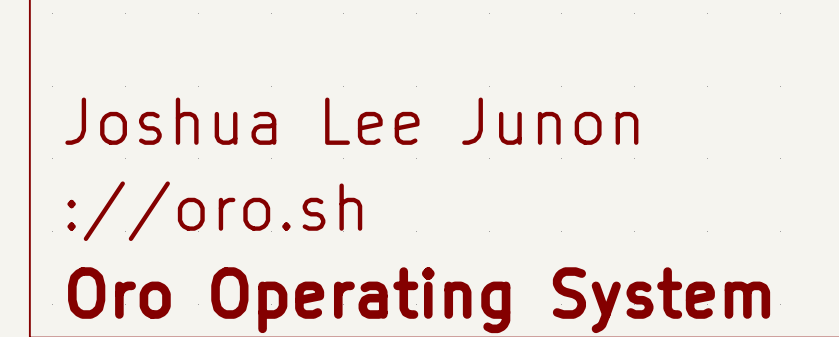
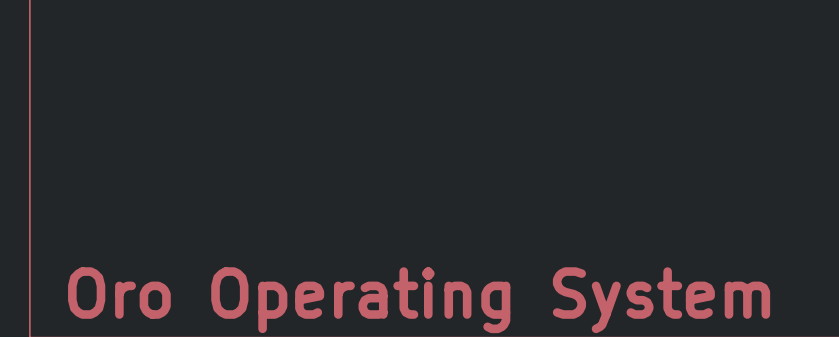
title block: Joshua Lee Junon (351, 121) -> none
title block: ://oro.sh (214, 211) -> none

